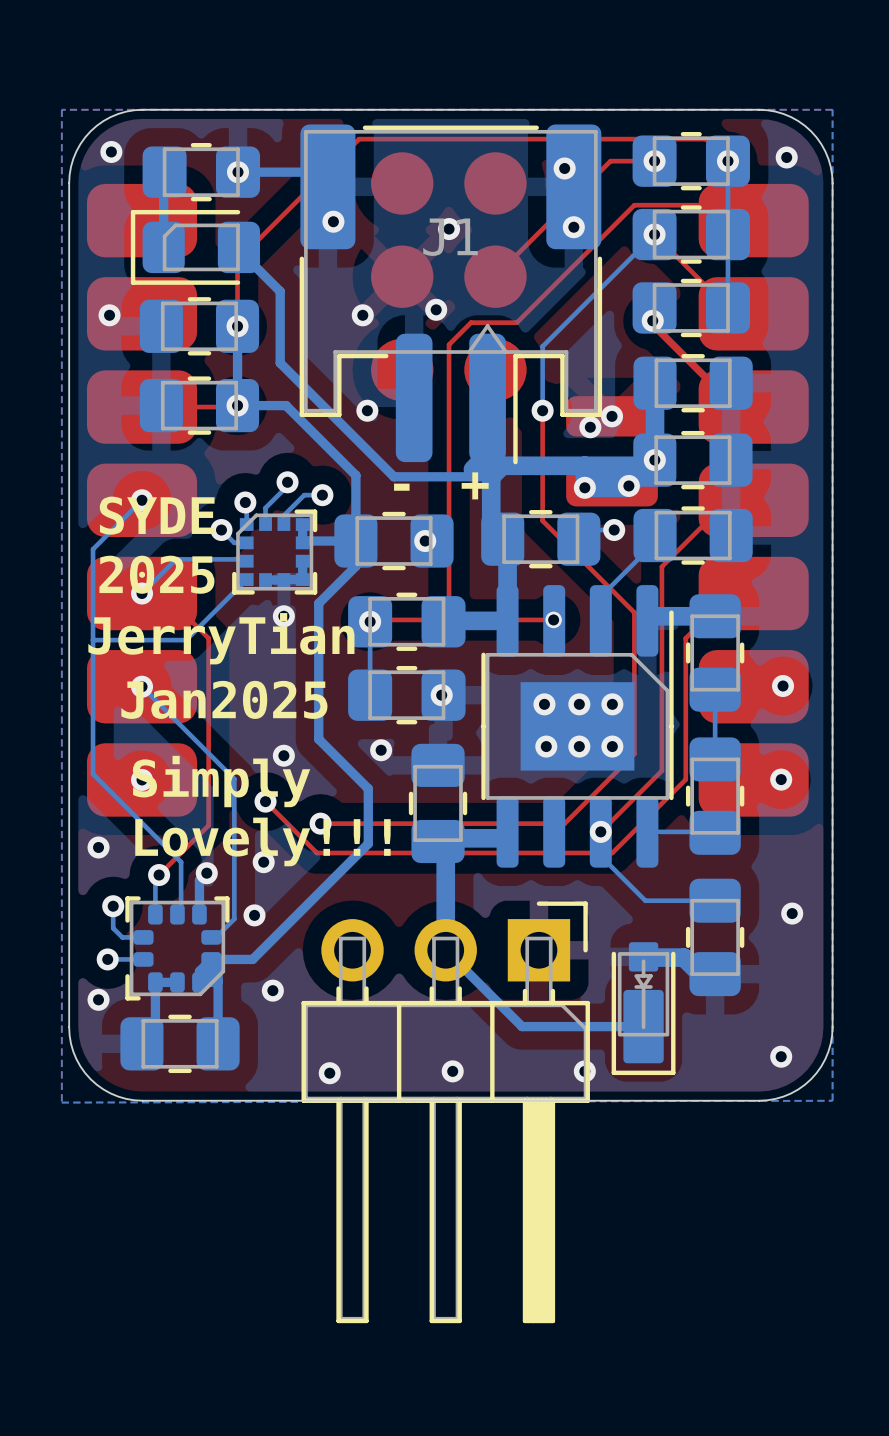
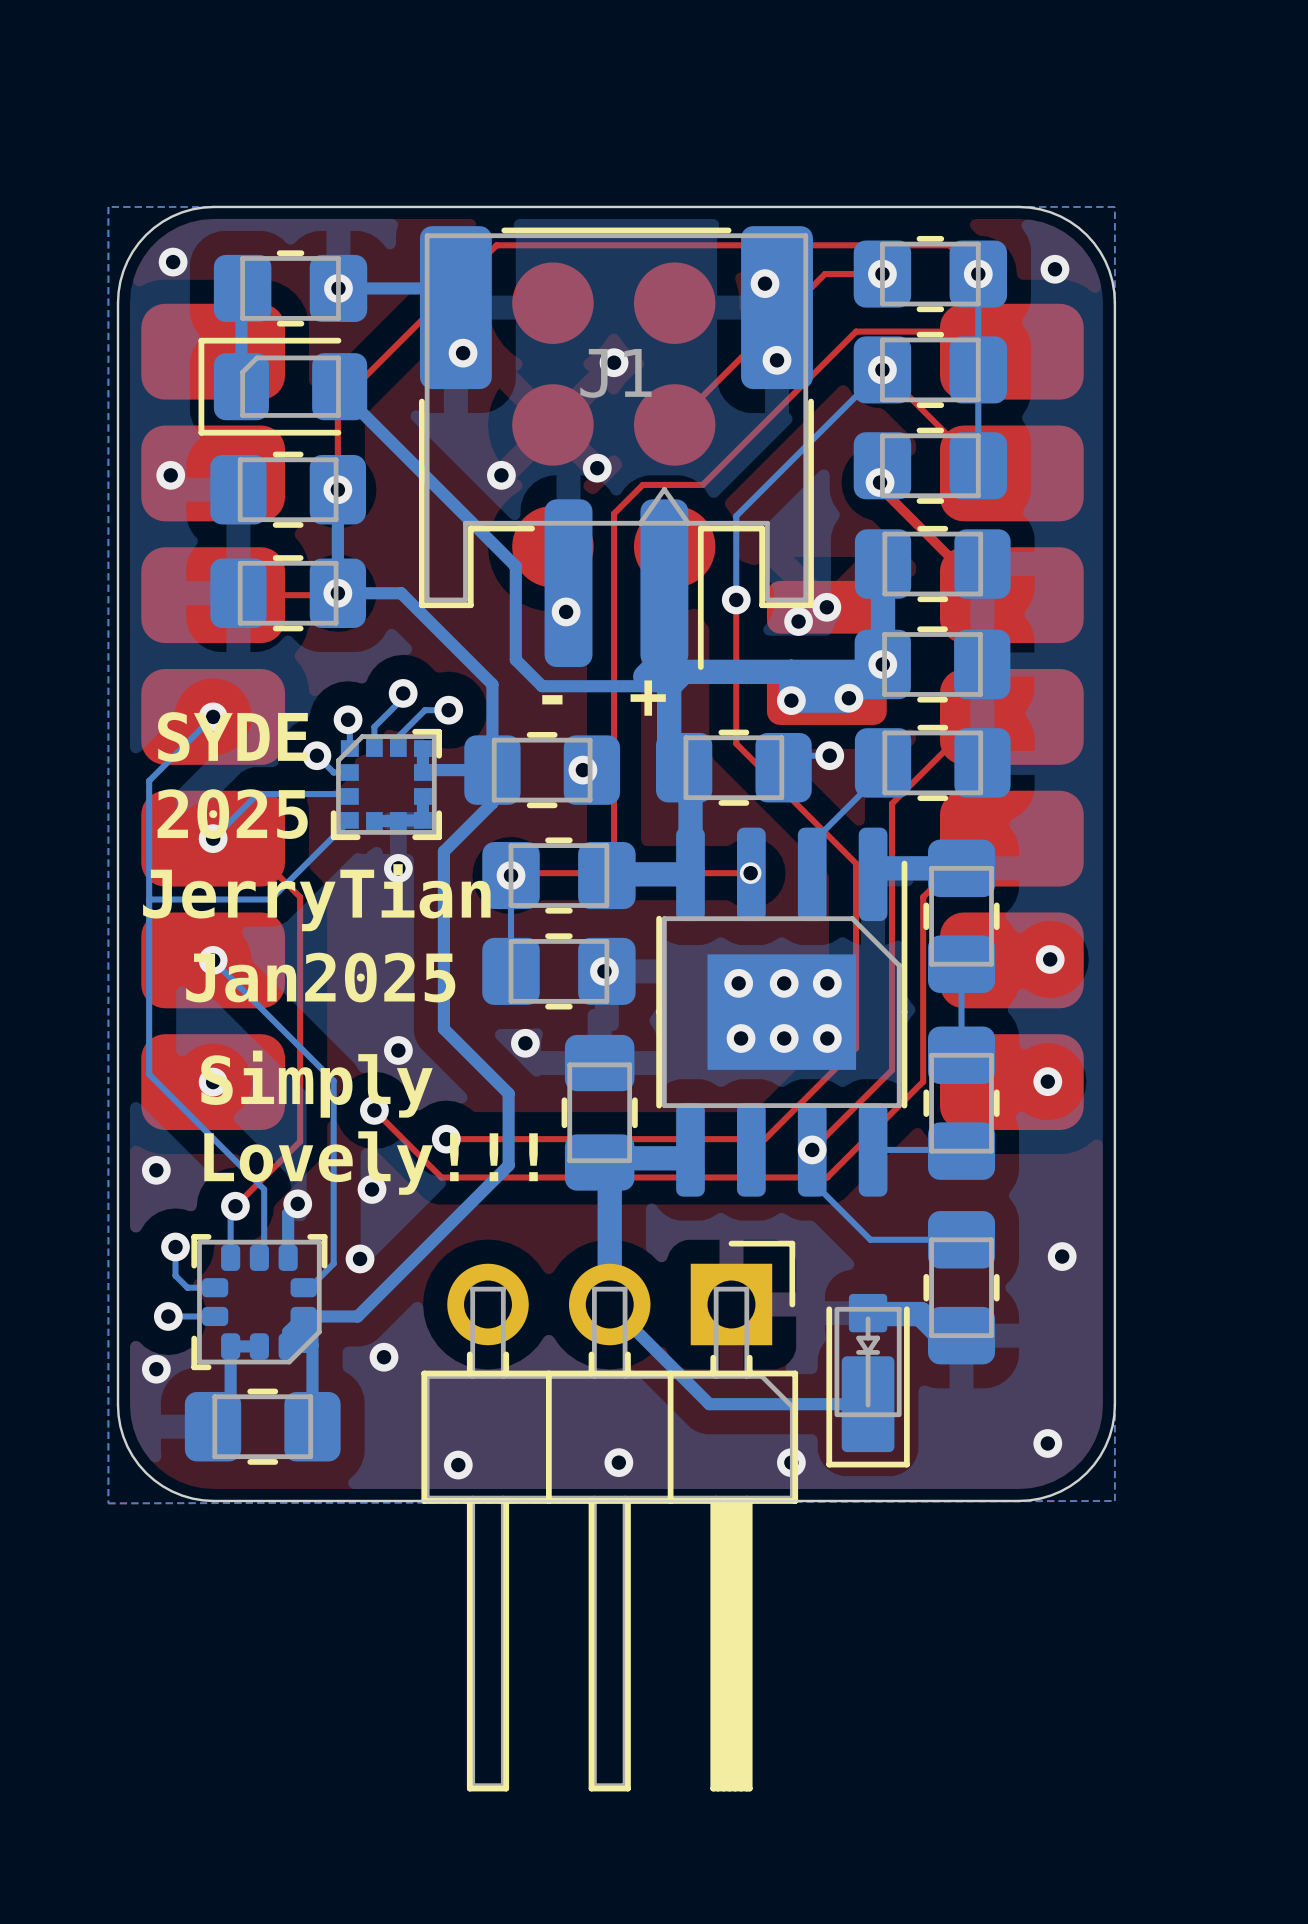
bottom track: (280, 291) (280, 363) (373, 456) -> (393, 444) (515, 566) (515, 659)
via position: (367, 410) -> (566, 611)

